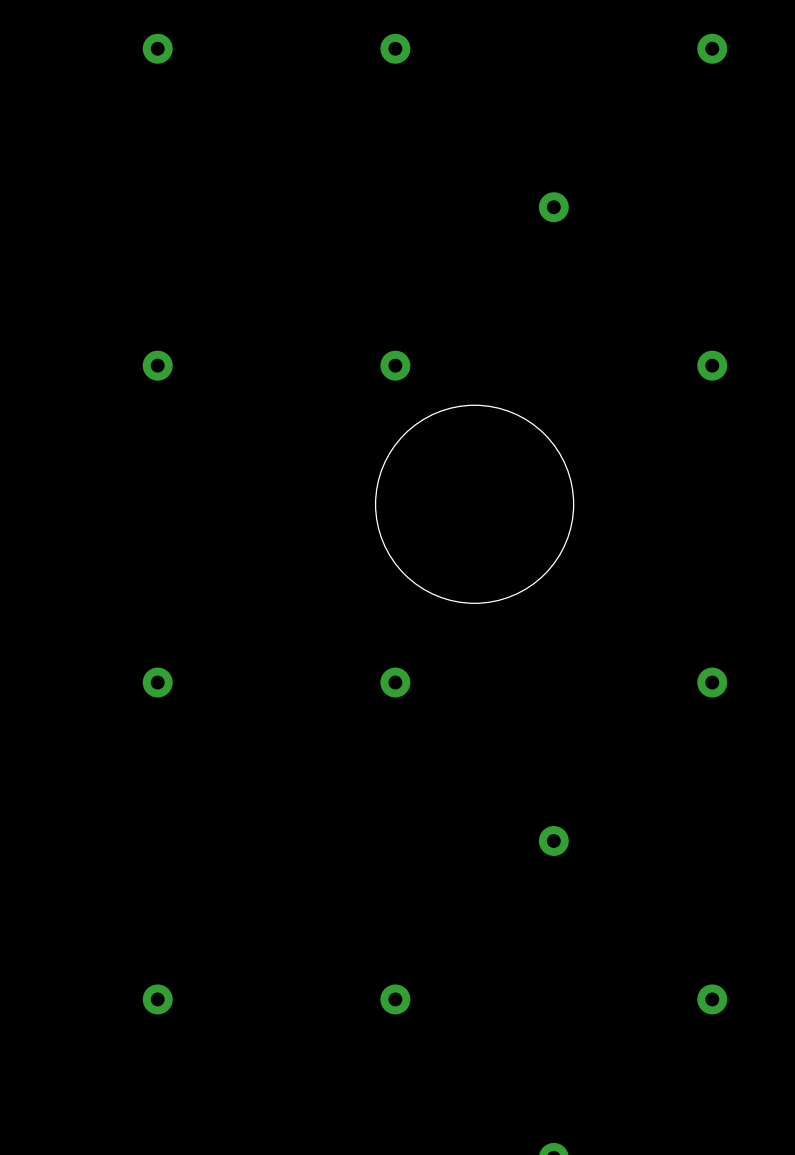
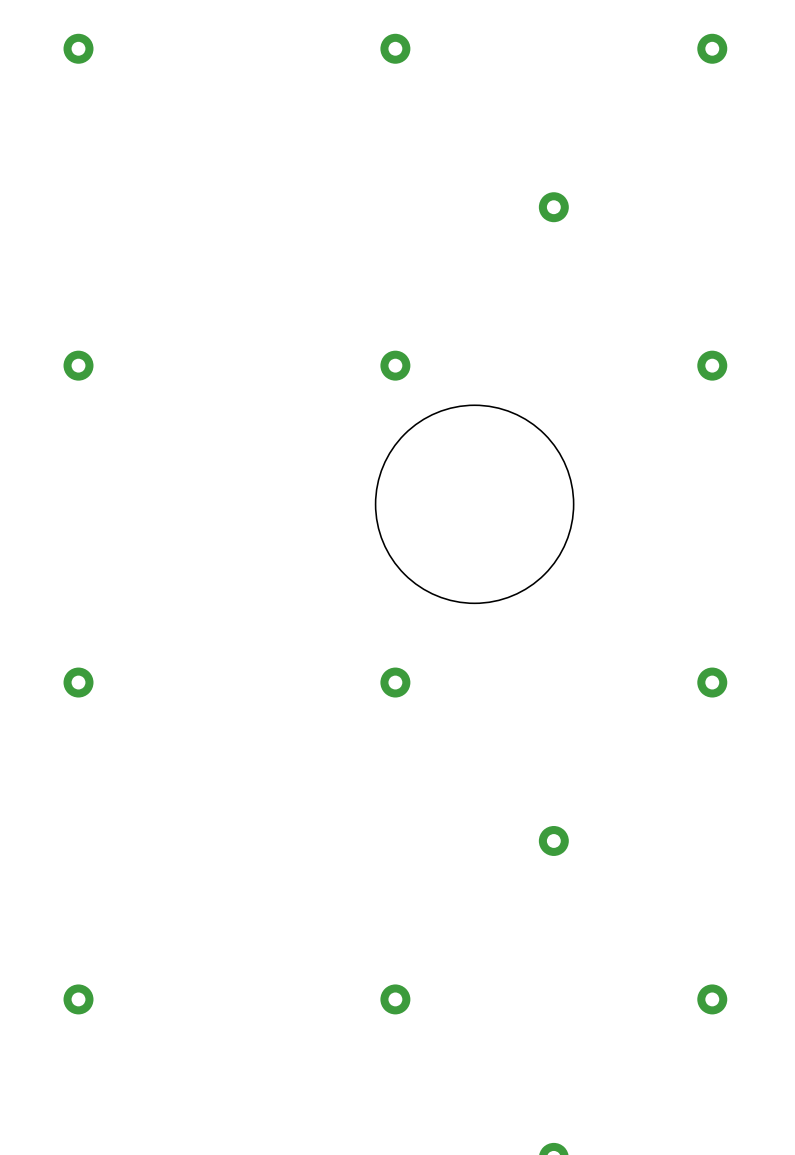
via position: (157, 48) -> (78, 48)
via position: (157, 365) -> (78, 365)
via position: (157, 682) -> (78, 682)
via position: (157, 999) -> (78, 999)

